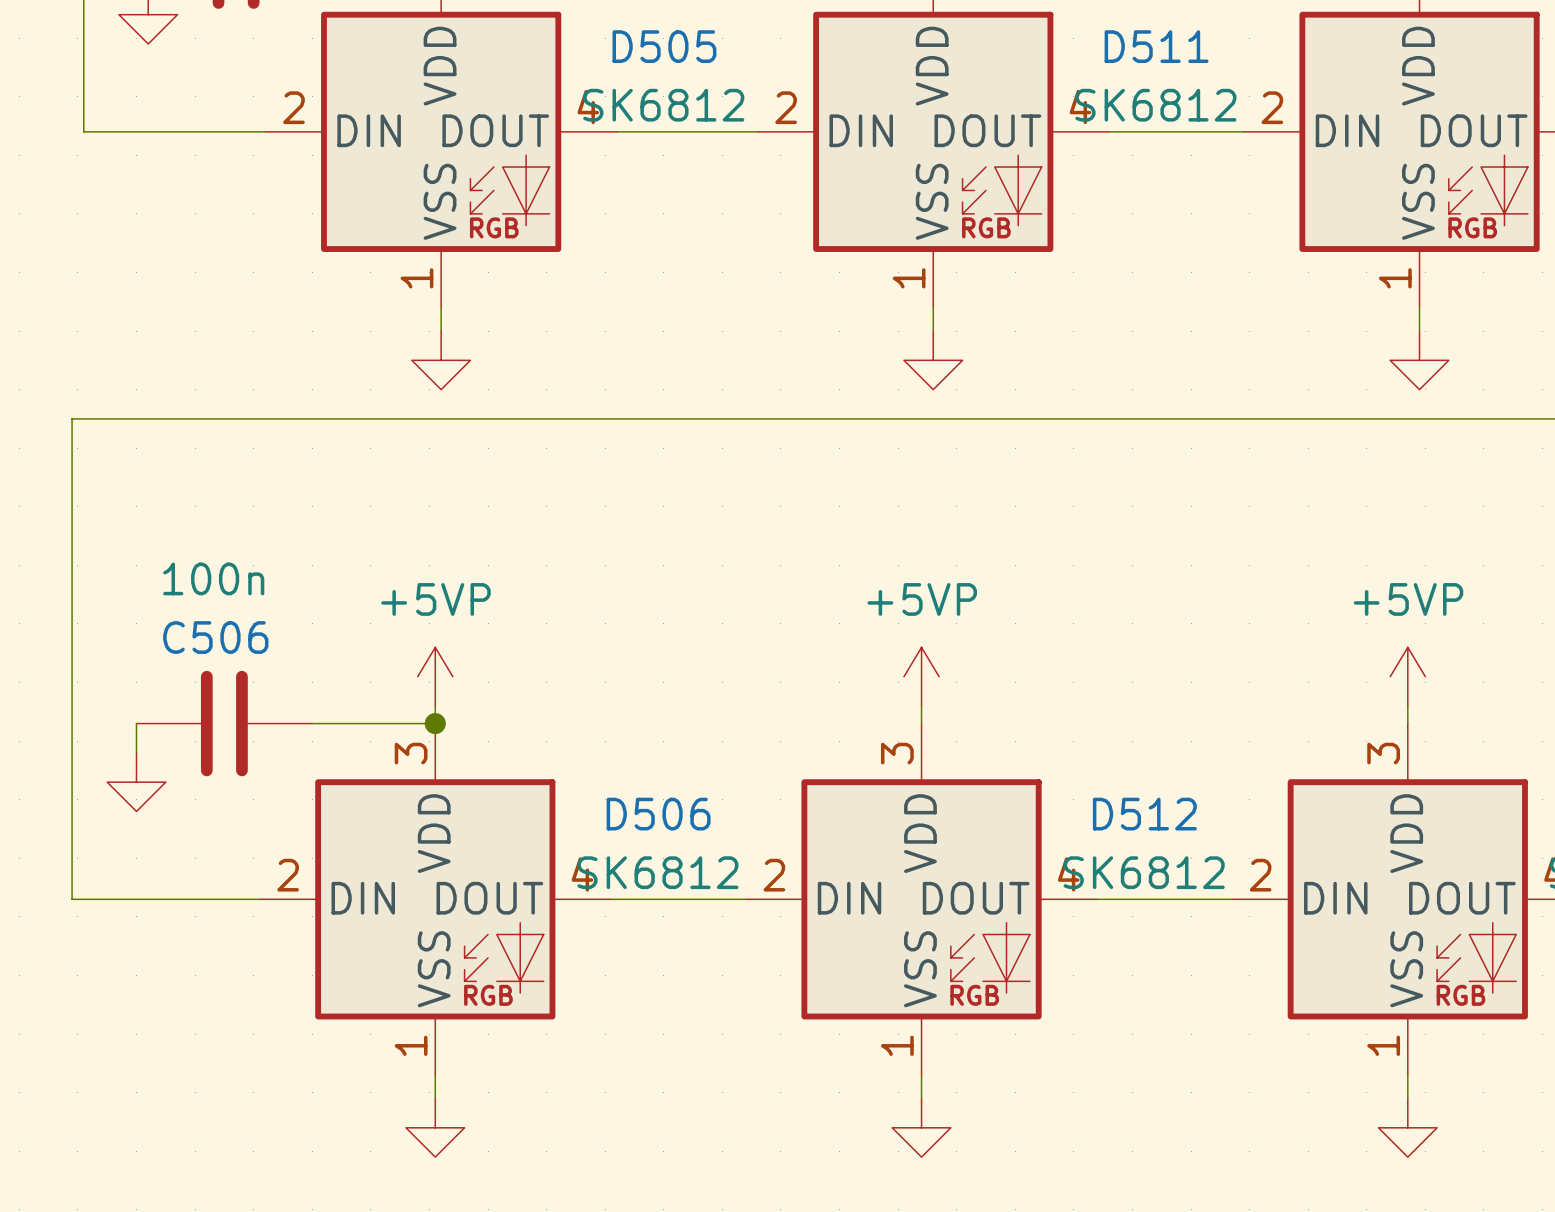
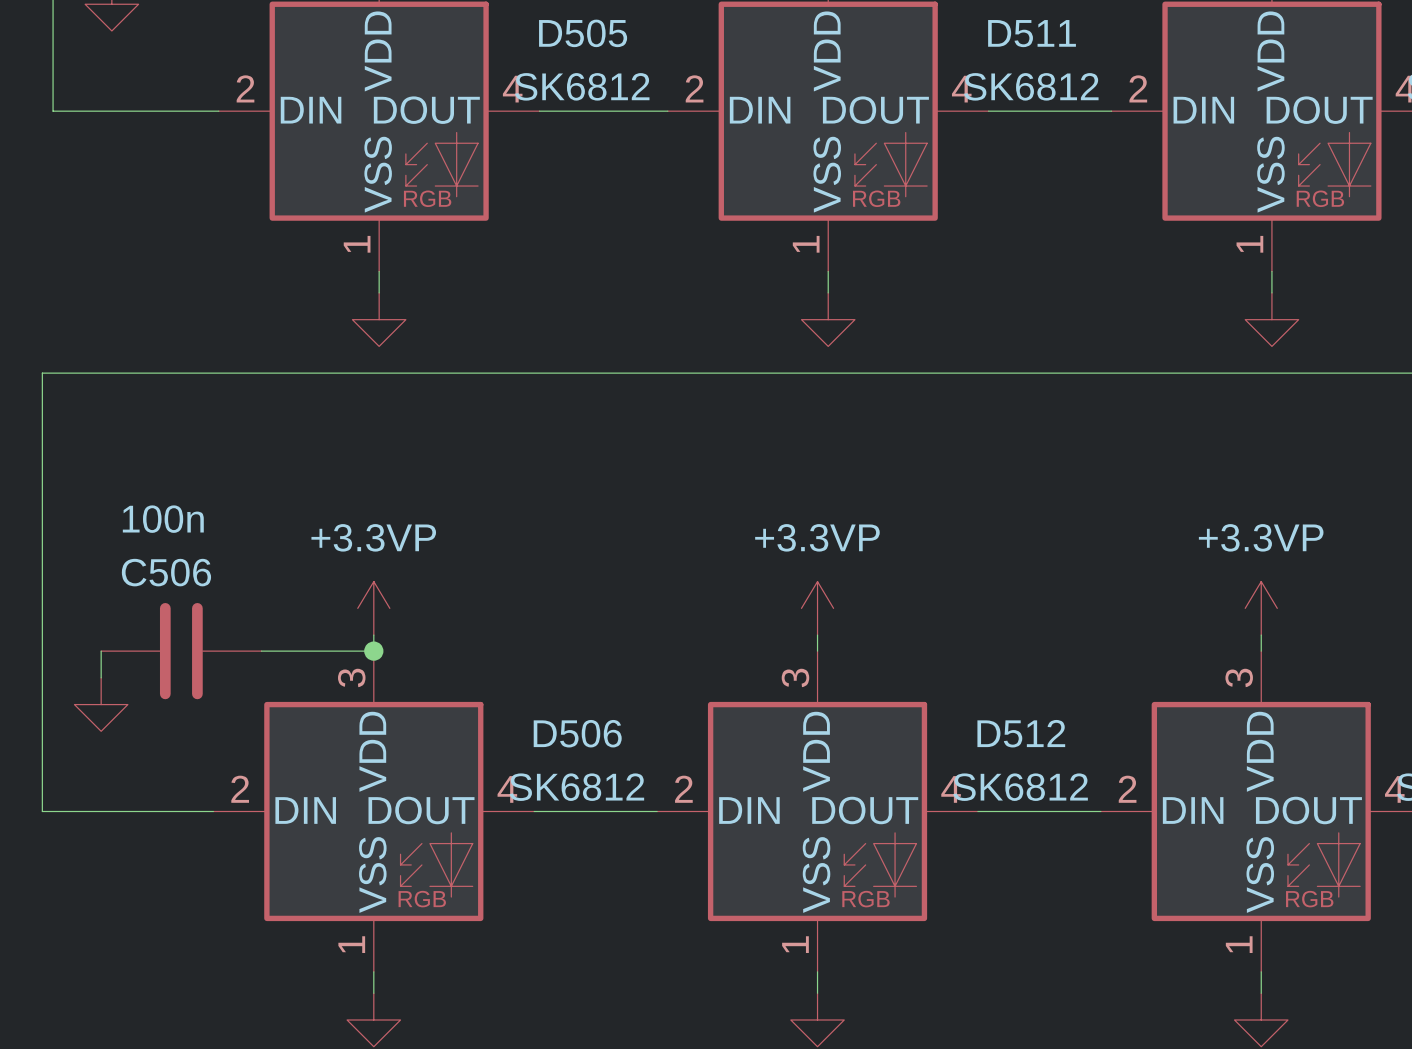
power symbol: +5VP (435, 676) -> +3.3VP (373, 608)
power symbol: +5VP (921, 676) -> +3.3VP (817, 608)
power symbol: +5VP (1407, 676) -> +3.3VP (1261, 608)

